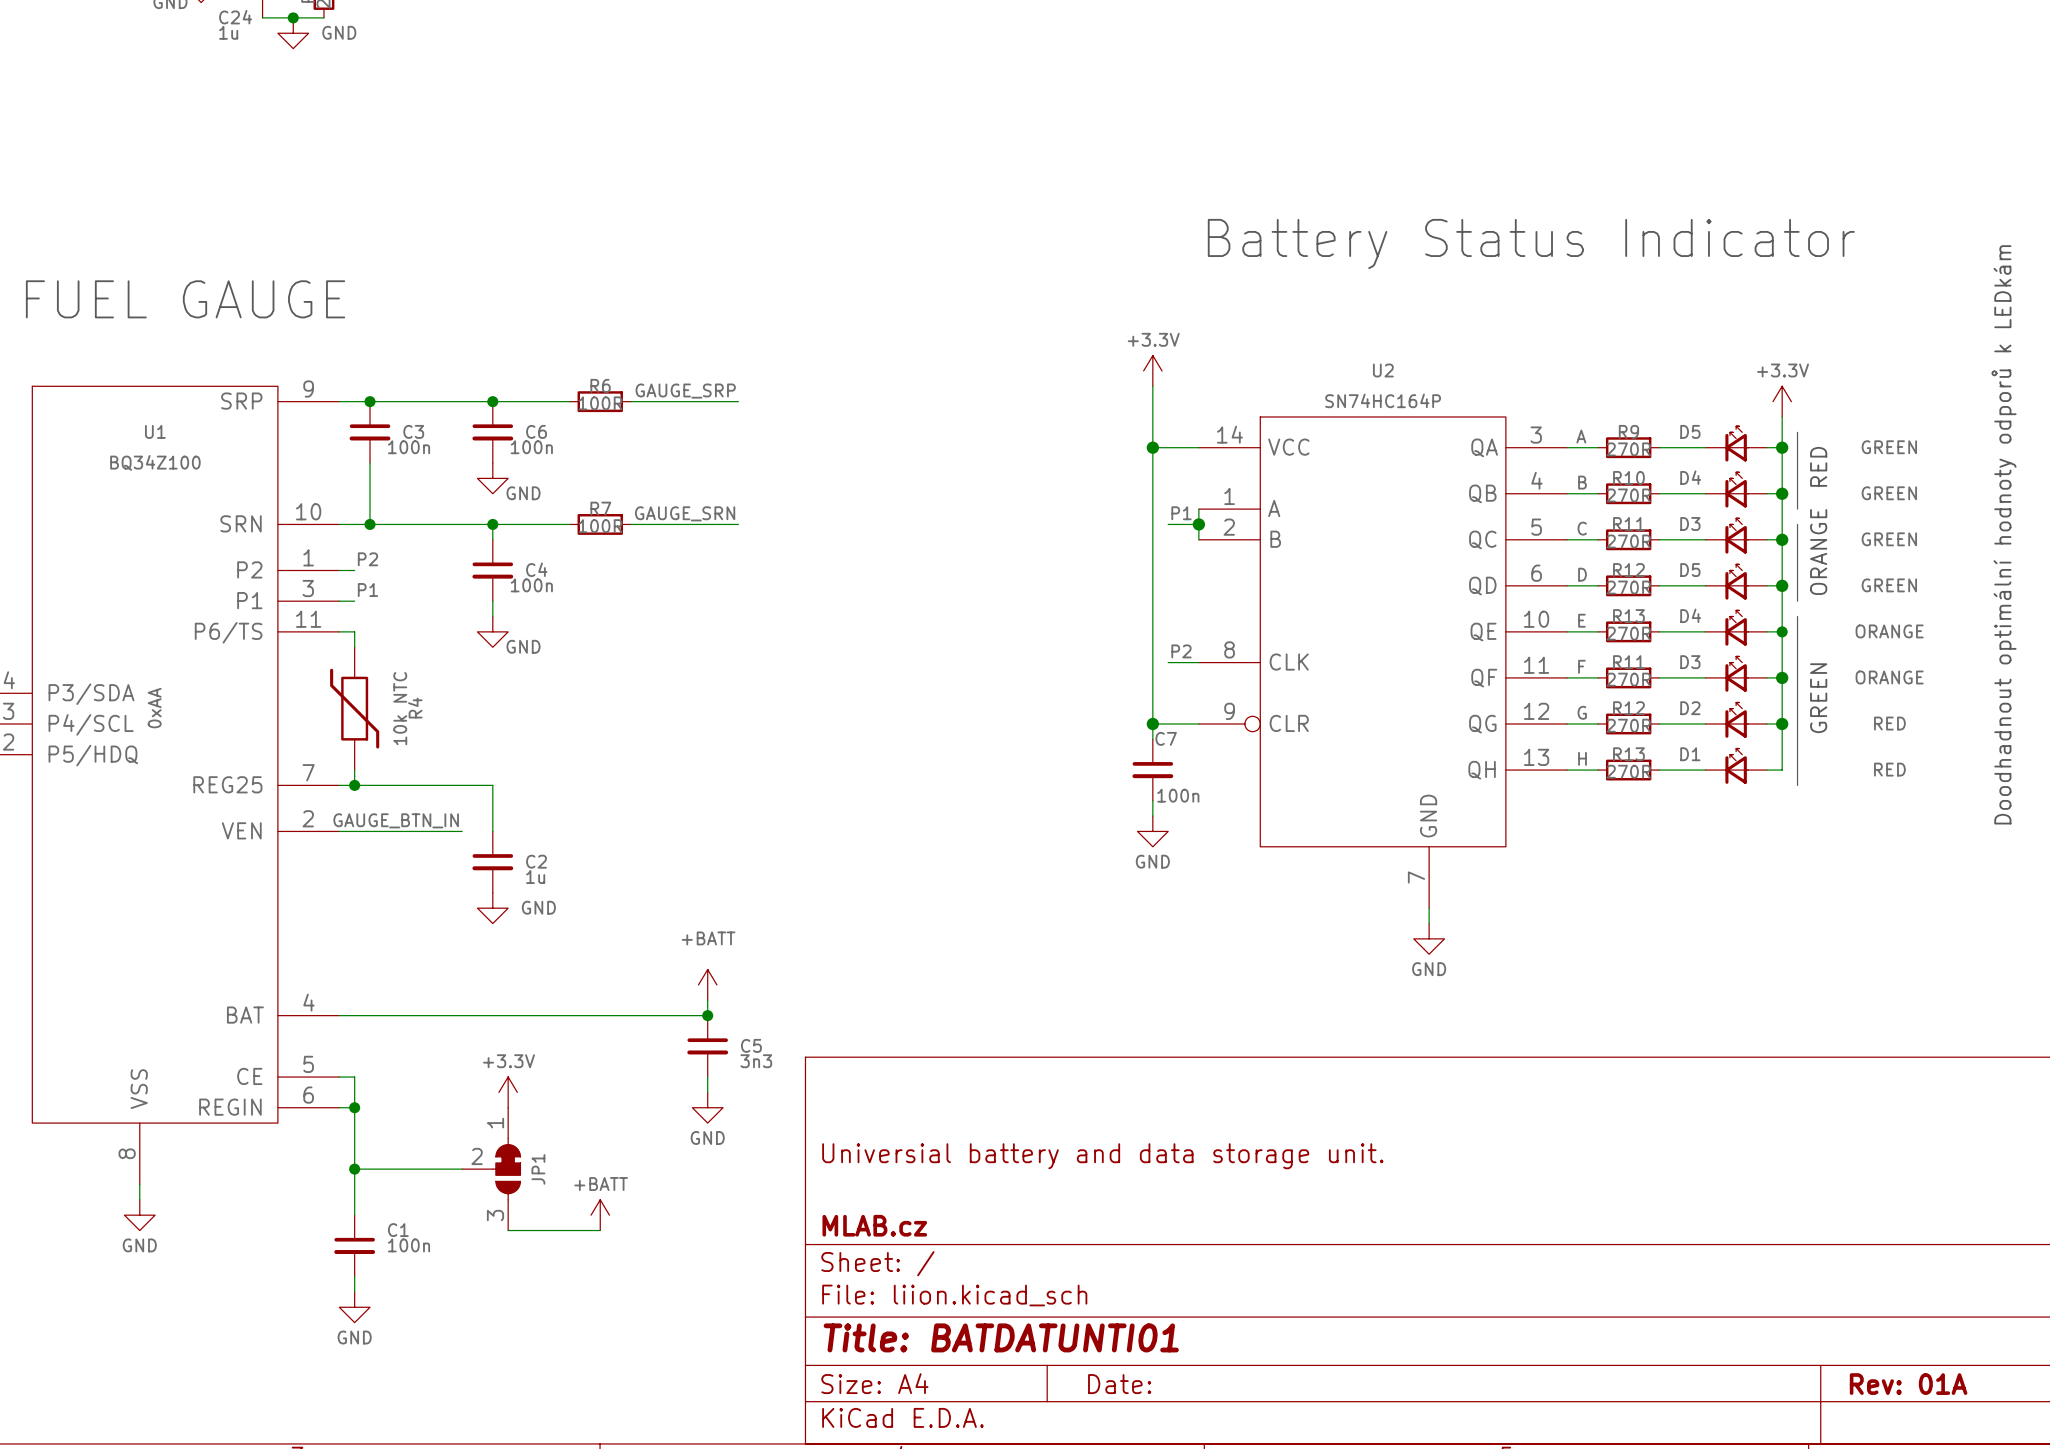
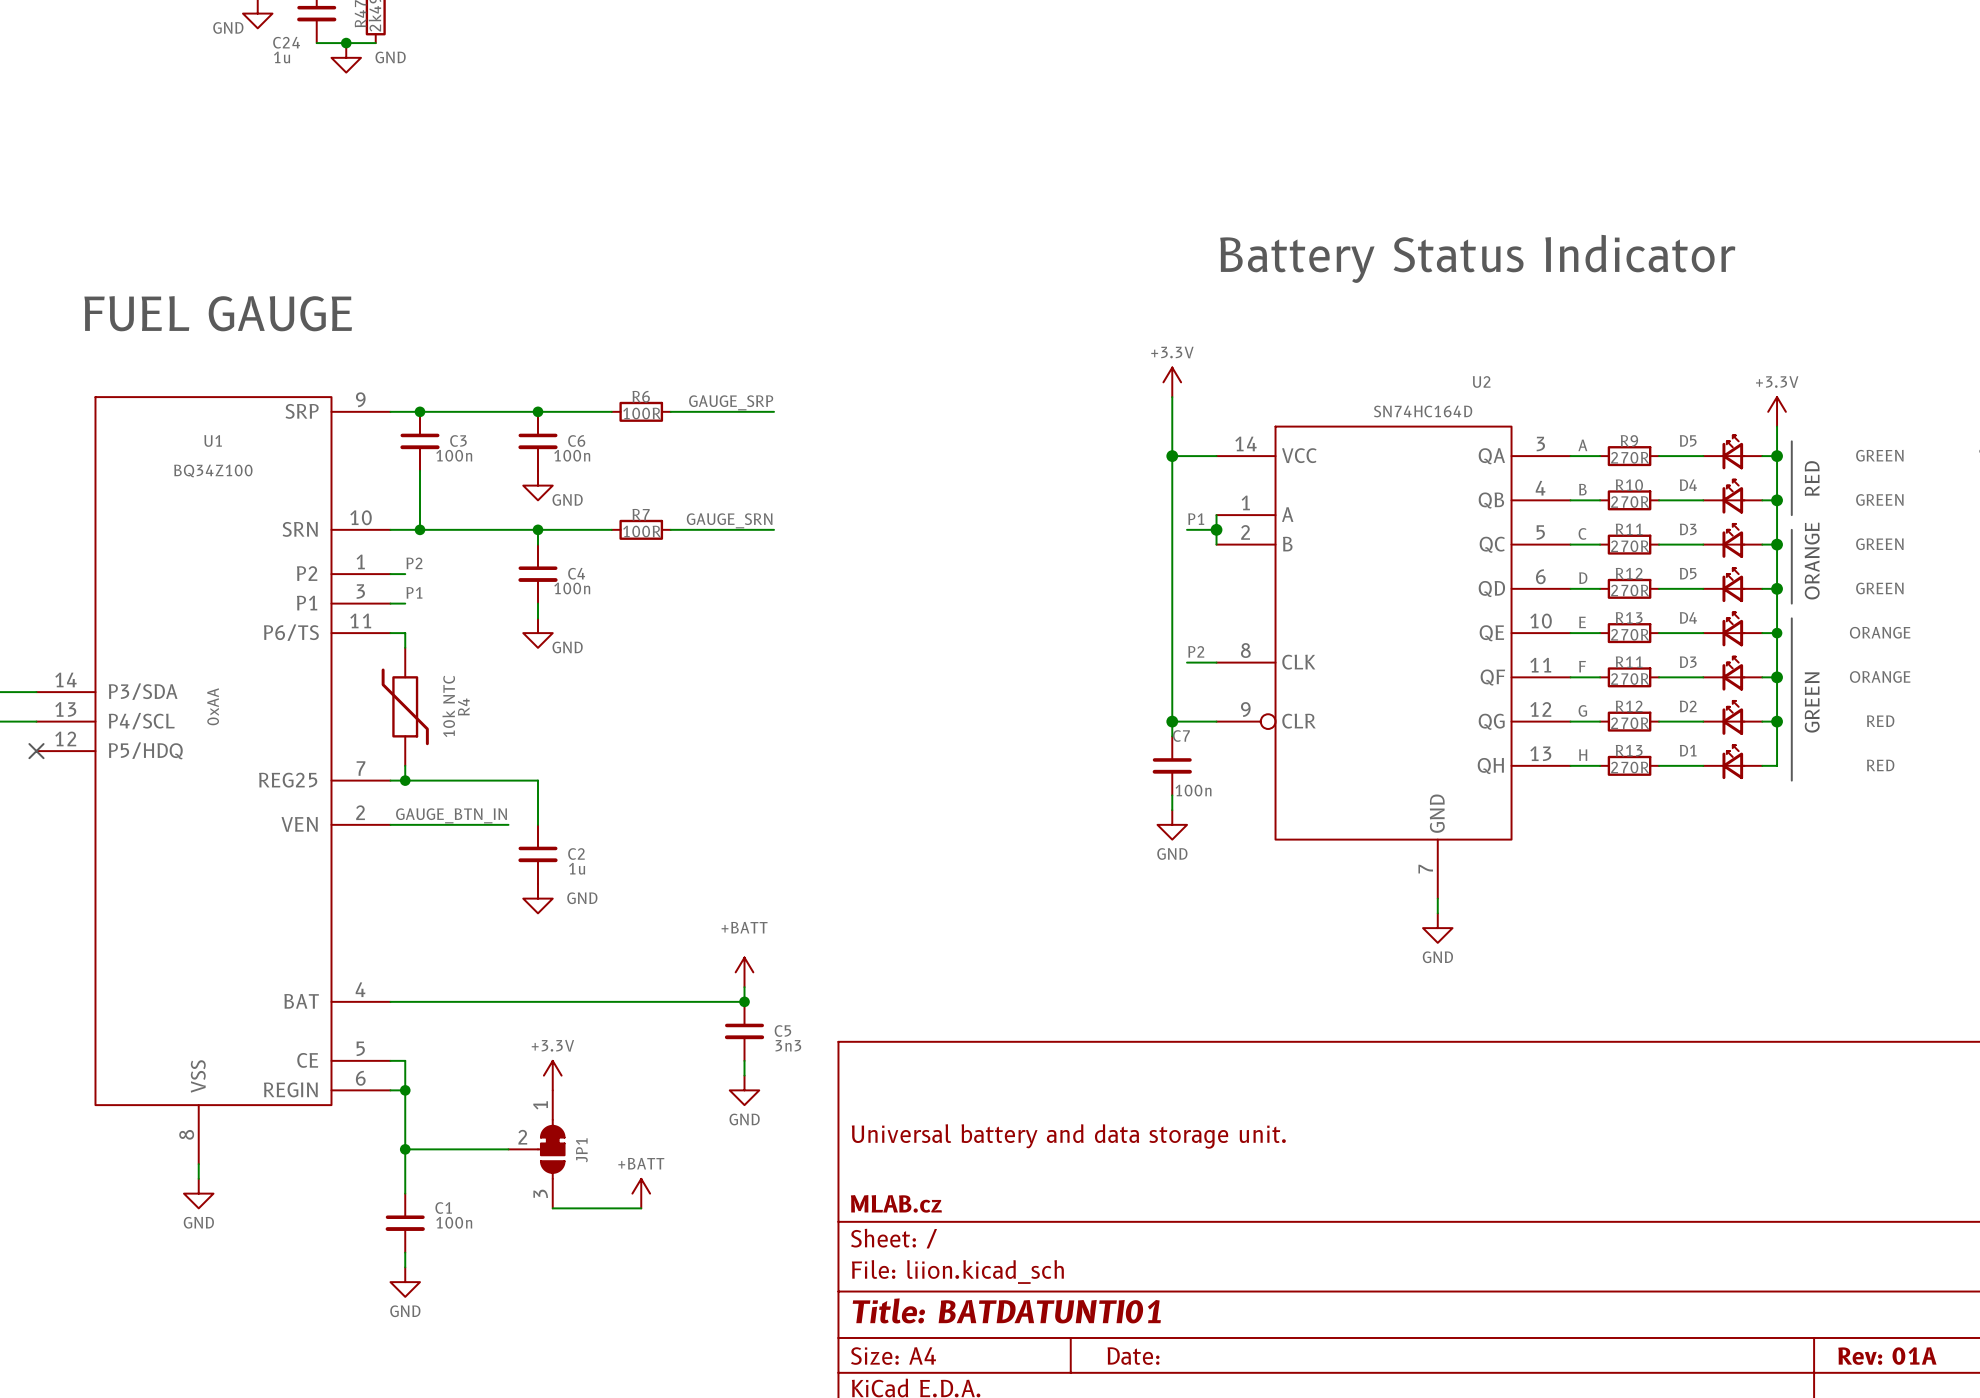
U2 name position: U2 (1383, 370) -> U2 (1481, 381)
U2 value: SN74HC164P (1383, 400) -> SN74HC164D (1423, 411)
title block: Universial battery and data storage unit. (1102, 1156) -> Universal battery and data storage unit. (1068, 1136)

